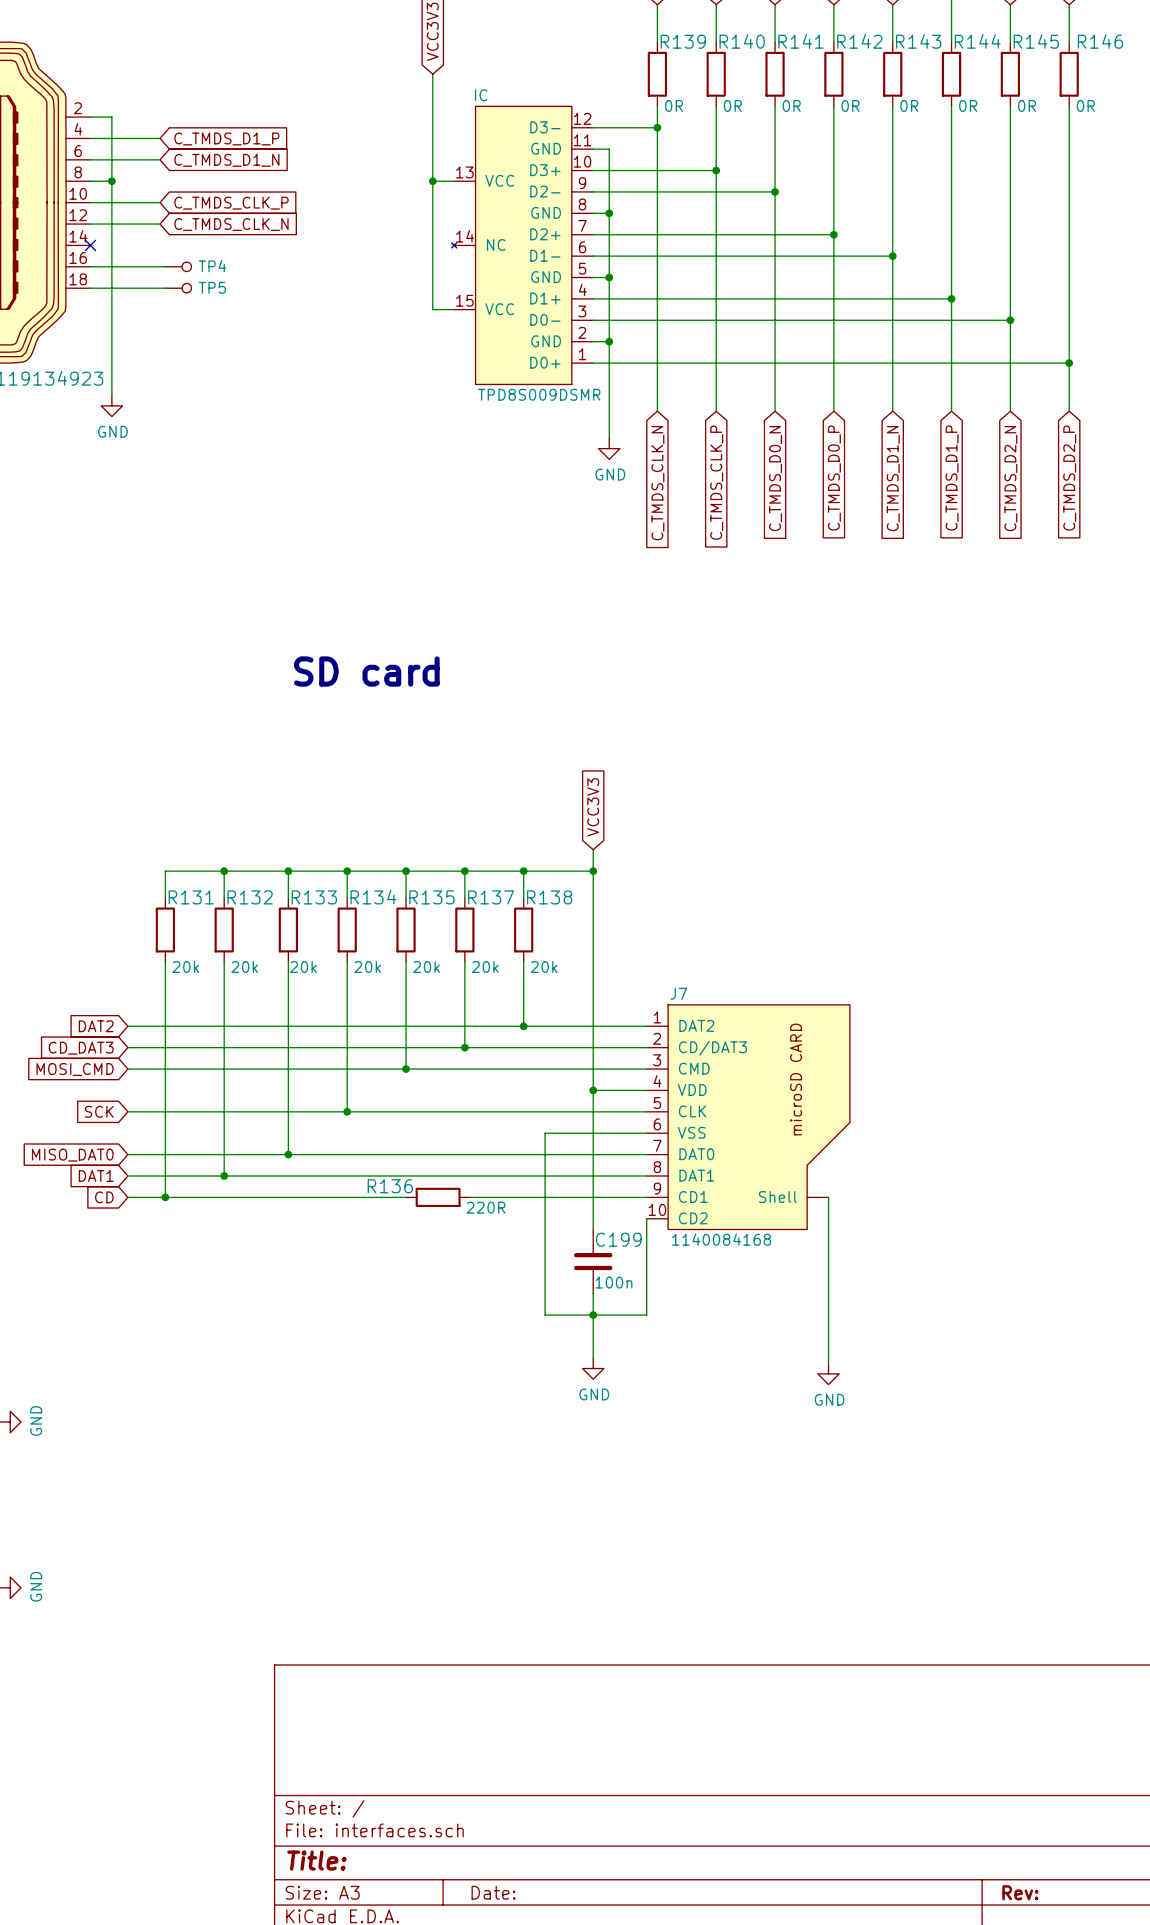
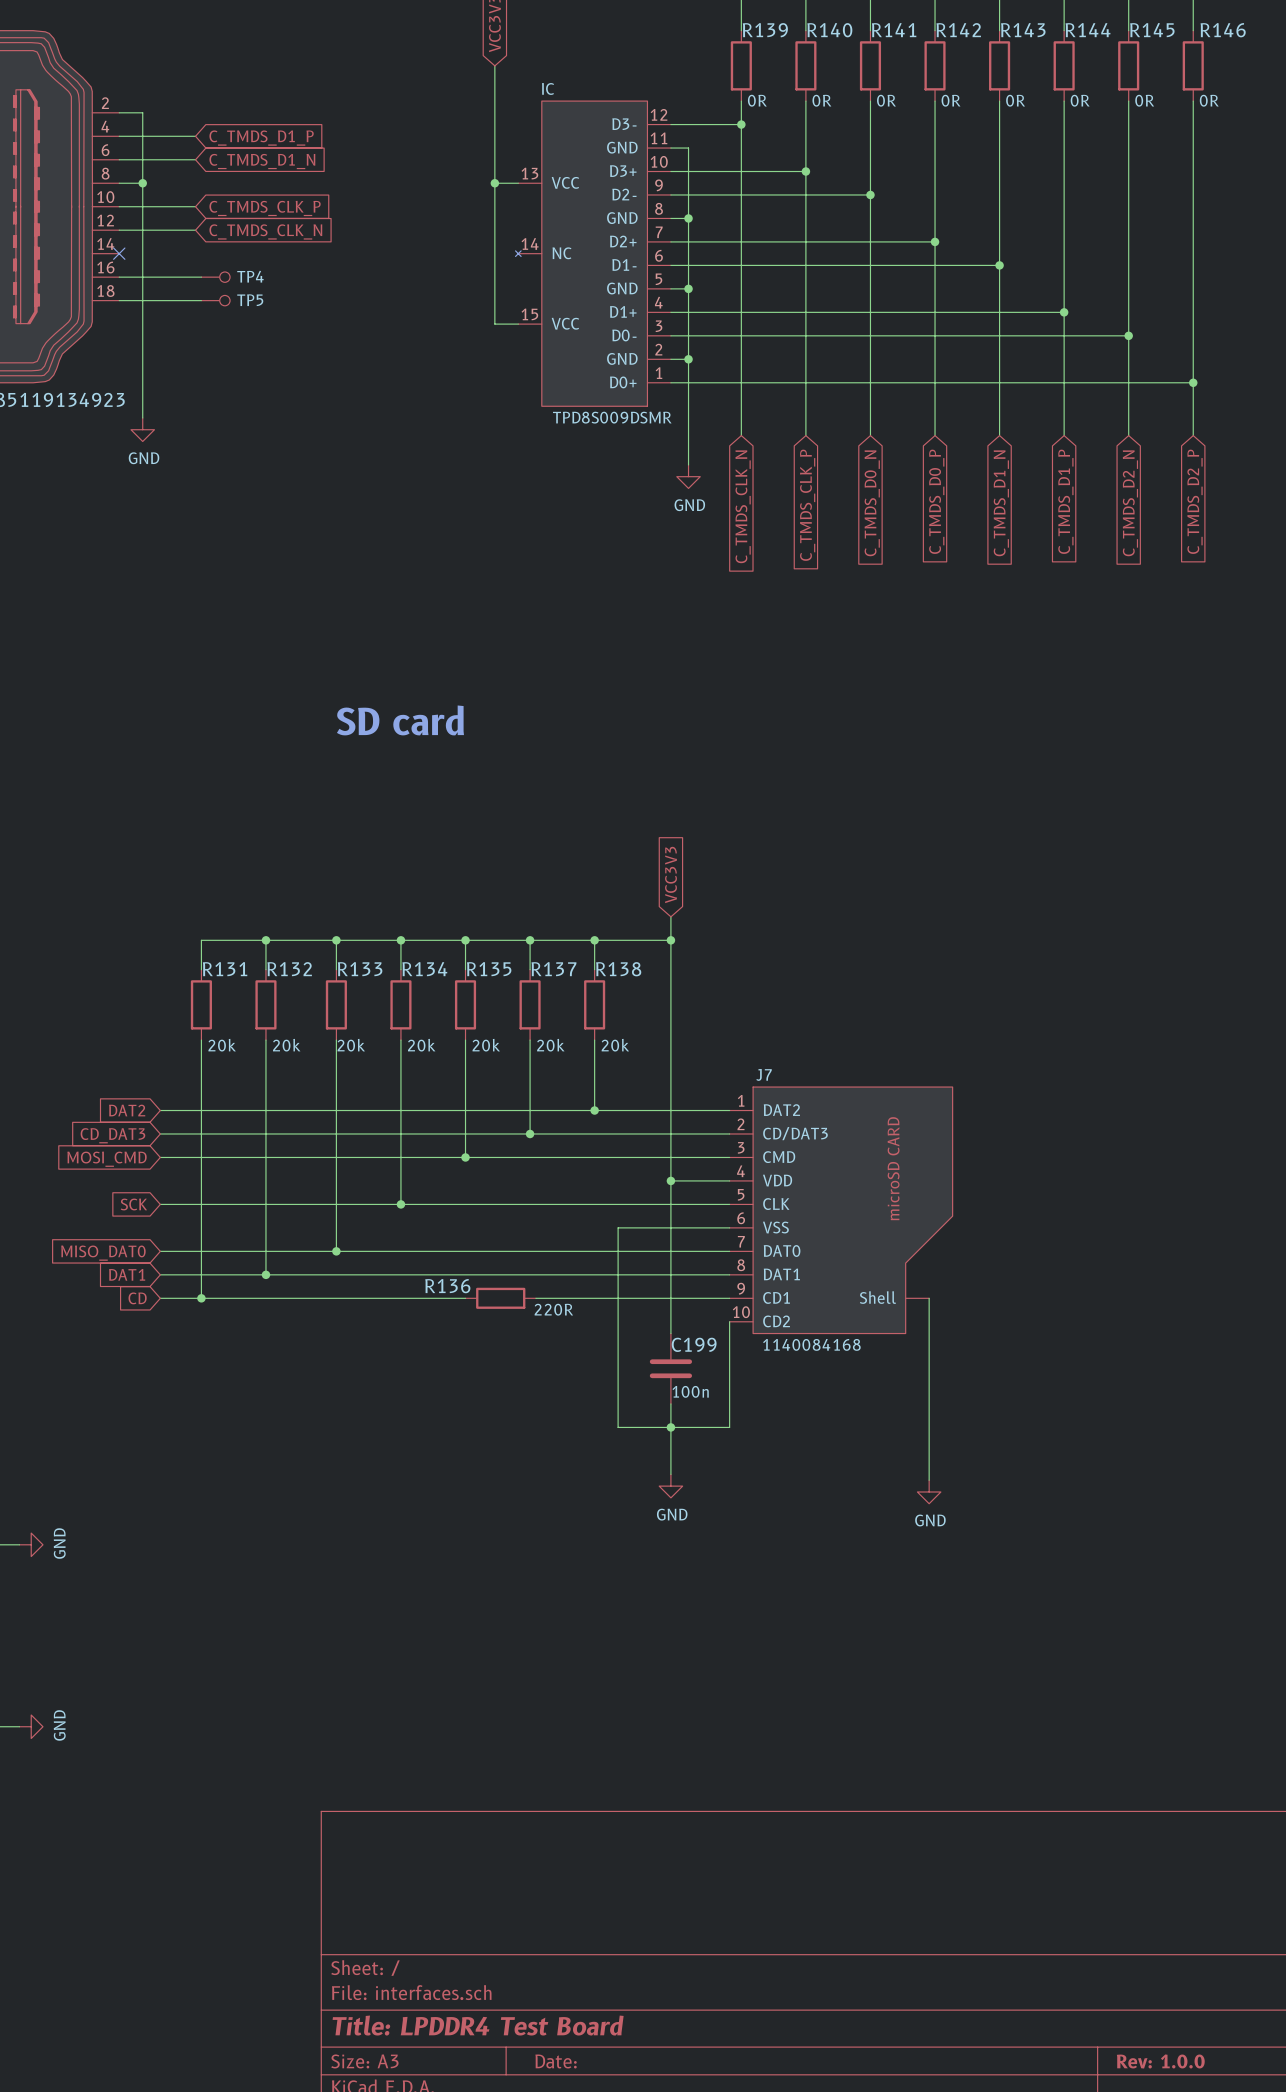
title block: Title: (316, 1860) -> Title: LPDDR4 Test Board (478, 2025)
title block: Rev: (1020, 1892) -> Rev: 1.0.0 (1160, 2061)

